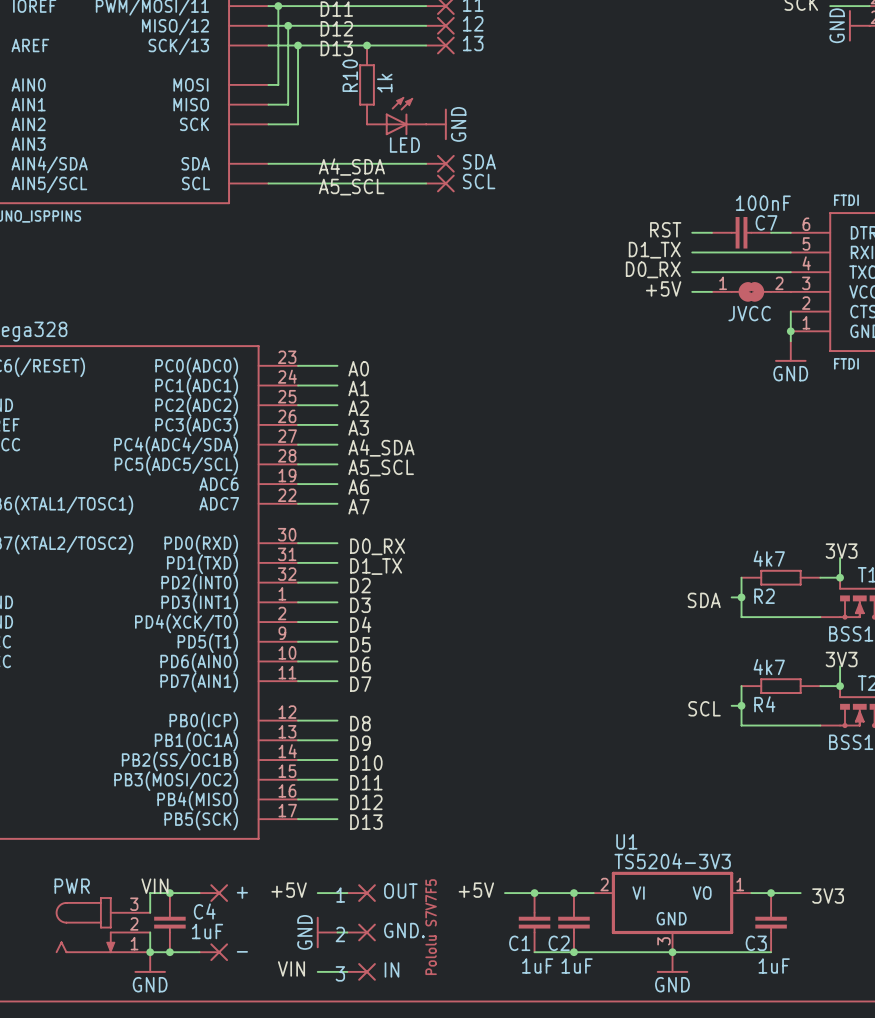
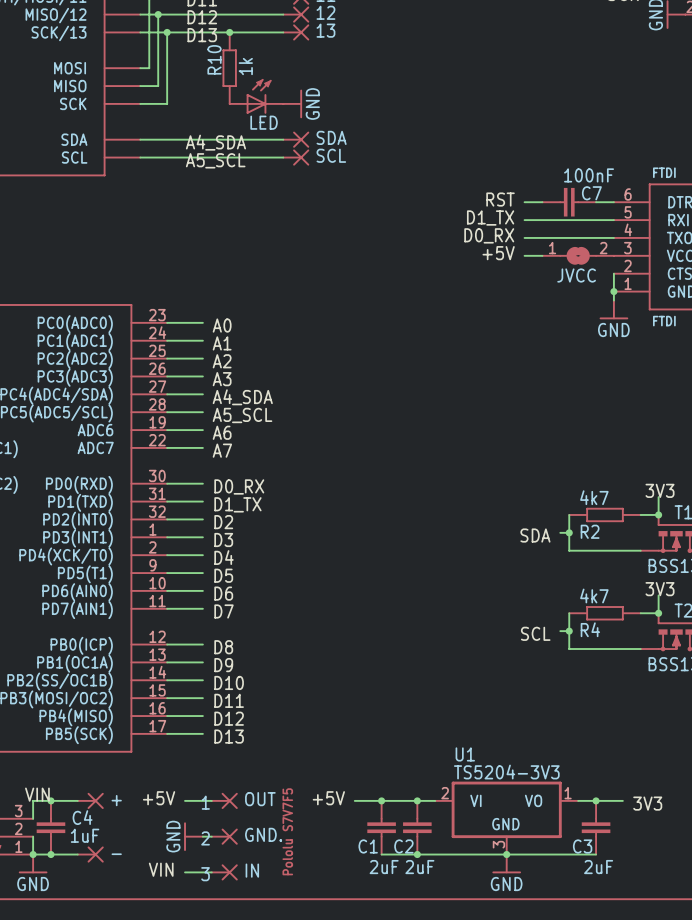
C1 value: 1uF (537, 966) -> 2uF (384, 867)
C2 value: 1uF (577, 966) -> 2uF (419, 867)
C3 value: 1uF (774, 966) -> 2uF (598, 867)

